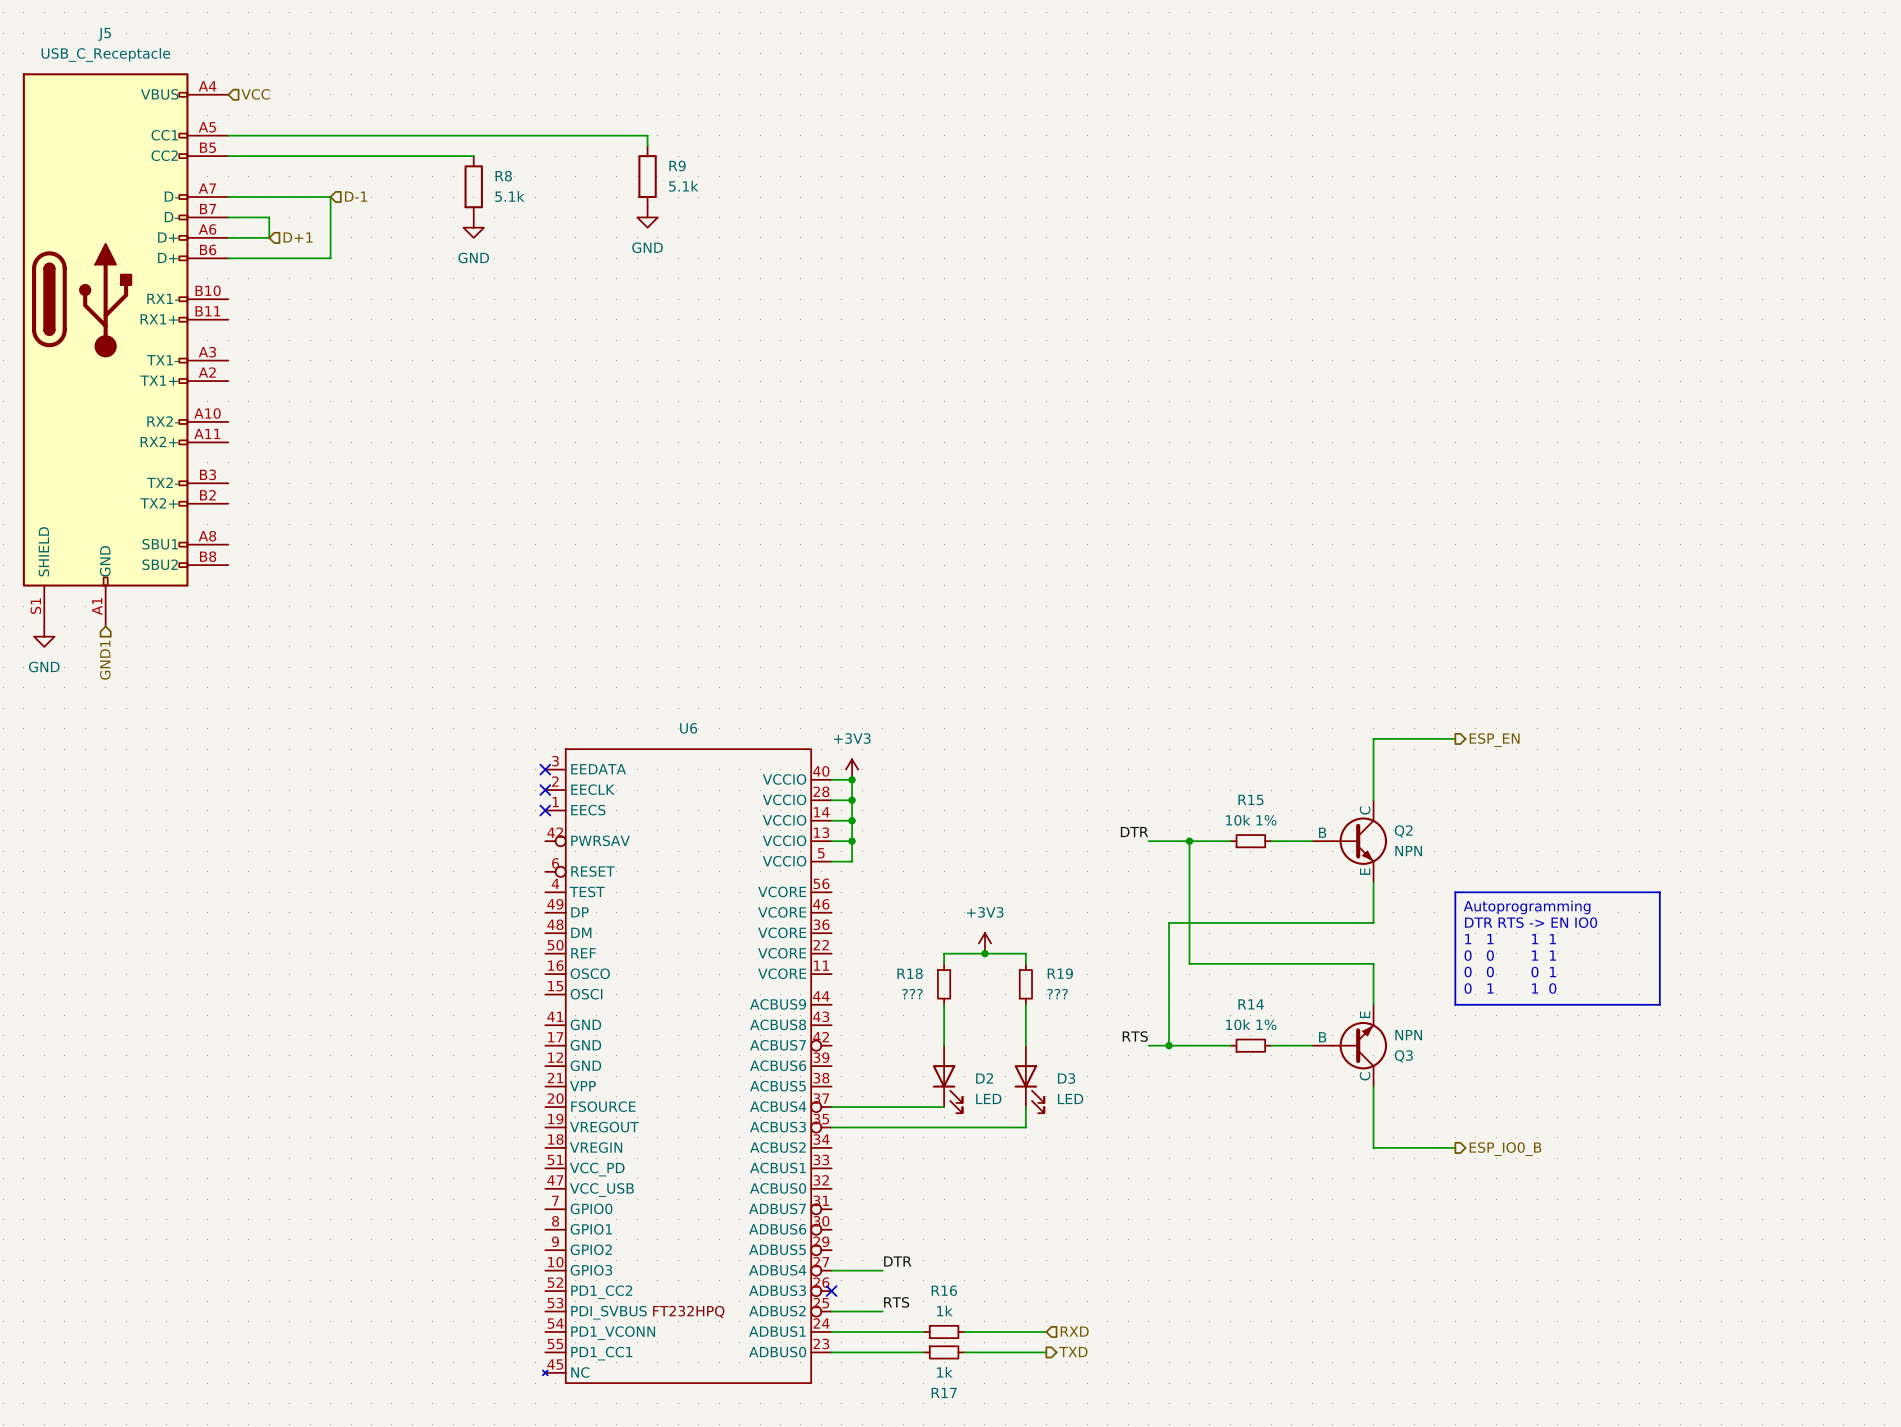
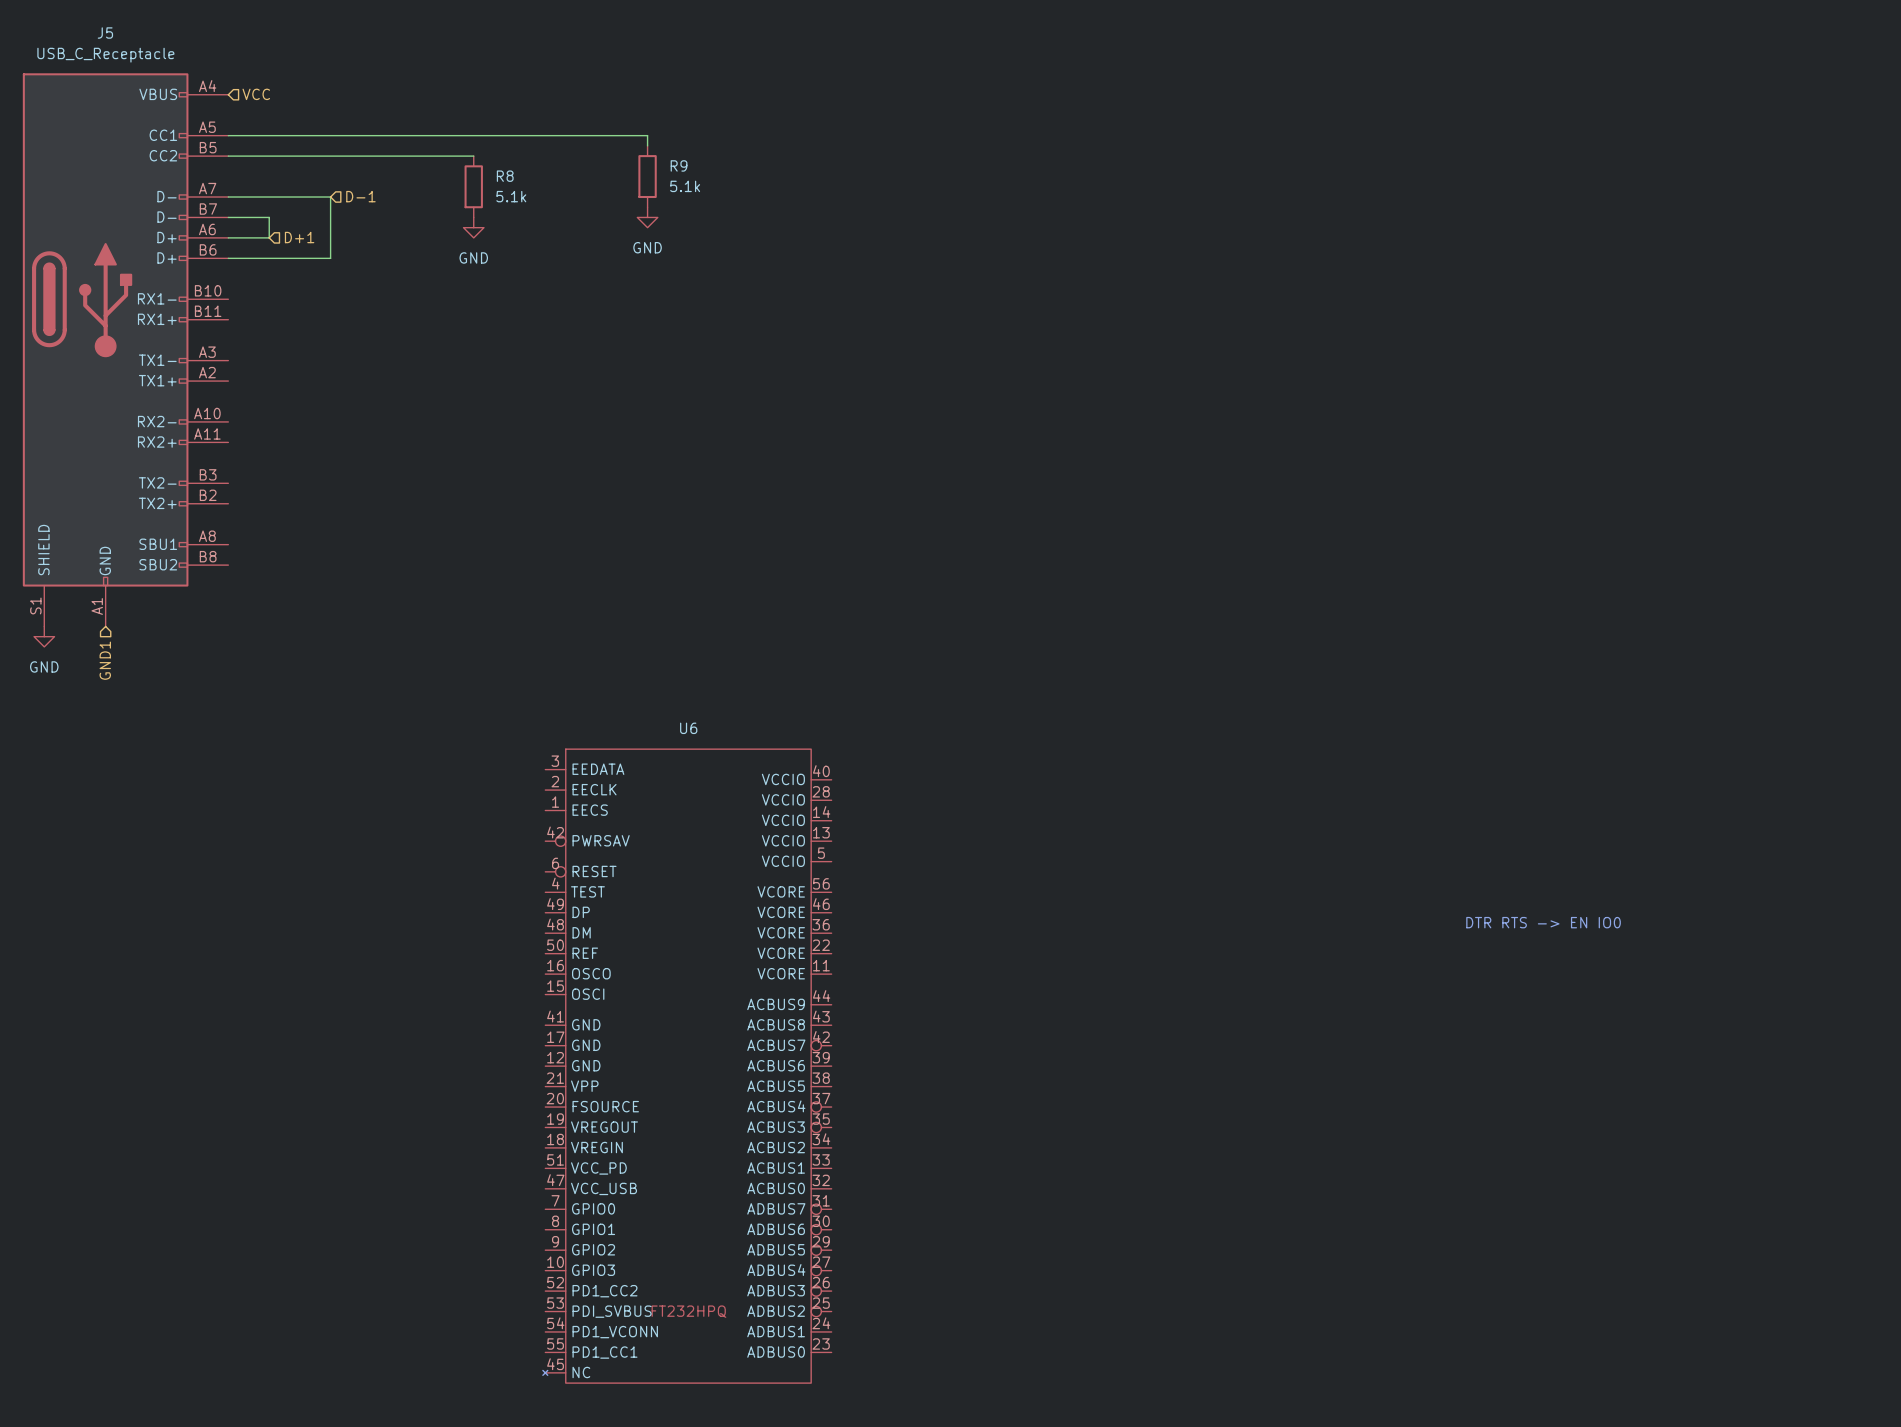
wire: (1455, 738) (1373, 738) (1373, 800) -> none
hierarchical label: ESP_EN (1494, 740) -> none
no-connect mark: (545, 769) -> none
power symbol: +3V3 (852, 769) -> none
wire: (831, 779) (852, 779) (852, 861) (831, 861) -> none
junction: (852, 779) -> none
no-connect mark: (545, 790) -> none
wire: (831, 800) (852, 800) -> none
junction: (852, 800) -> none
no-connect mark: (545, 810) -> none
wire: (831, 820) (852, 820) -> none
junction: (852, 820) -> none
label: DTR (1134, 832) -> none
wire: (831, 841) (852, 841) -> none
junction: (852, 841) -> none
wire: (1148, 841) (1230, 841) -> none
wire: (1189, 841) (1189, 963) (1373, 963) (1373, 1004) -> none
junction: (1189, 841) -> none
R15: 10k 1% (1250, 841) -> none
wire: (1271, 841) (1312, 841) -> none
Q2: NPN (1349, 841) -> none
wire: (1373, 882) (1373, 922) (1169, 922) (1169, 1045) -> none
line: (1455, 892) (1659, 892) (1659, 1004) (1455, 1004) (1455, 892) -> none
text: Autoprogramming (1527, 907) -> none
text: 1 1 1 1 (1510, 939) -> none
power symbol: +3V3 (984, 943) -> none
junction: (984, 953) -> none
text: 0 0 1 1 (1510, 955) -> none
wire: (944, 963) (944, 953) (1025, 953) (1025, 963) -> none
text: 0 0 0 1 (1510, 972) -> none
R18: ??? (944, 984) -> none
R19: ??? (1025, 984) -> none
text: 0 1 1 0 (1510, 988) -> none
wire: (944, 1004) (944, 1045) -> none
wire: (1025, 1004) (1025, 1045) -> none
label: RTS (1135, 1036) -> none
wire: (1148, 1045) (1230, 1045) -> none
junction: (1169, 1045) -> none
R14: 10k 1% (1250, 1045) -> none
wire: (1271, 1045) (1312, 1045) -> none
Q3: NPN (1349, 1045) -> none
D2: LED (947, 1079) -> none
D3: LED (1029, 1079) -> none
wire: (1373, 1086) (1373, 1147) (1455, 1147) -> none
wire: (831, 1107) (944, 1107) -> none
wire: (1025, 1107) (1025, 1127) (831, 1127) -> none
hierarchical label: ESP_IO0_B (1505, 1149) -> none
label: DTR (897, 1261) -> none
wire: (831, 1270) (882, 1270) -> none
no-connect mark: (831, 1291) -> none
label: RTS (896, 1302) -> none
wire: (831, 1311) (882, 1311) -> none
wire: (831, 1331) (923, 1331) -> none
R16: 1k (944, 1331) -> none
wire: (964, 1331) (1046, 1331) -> none
hierarchical label: RXD (1074, 1331) -> none
wire: (831, 1352) (923, 1352) -> none
R17: 1k (944, 1352) -> none
wire: (964, 1352) (1046, 1352) -> none
hierarchical label: TXD (1073, 1352) -> none

